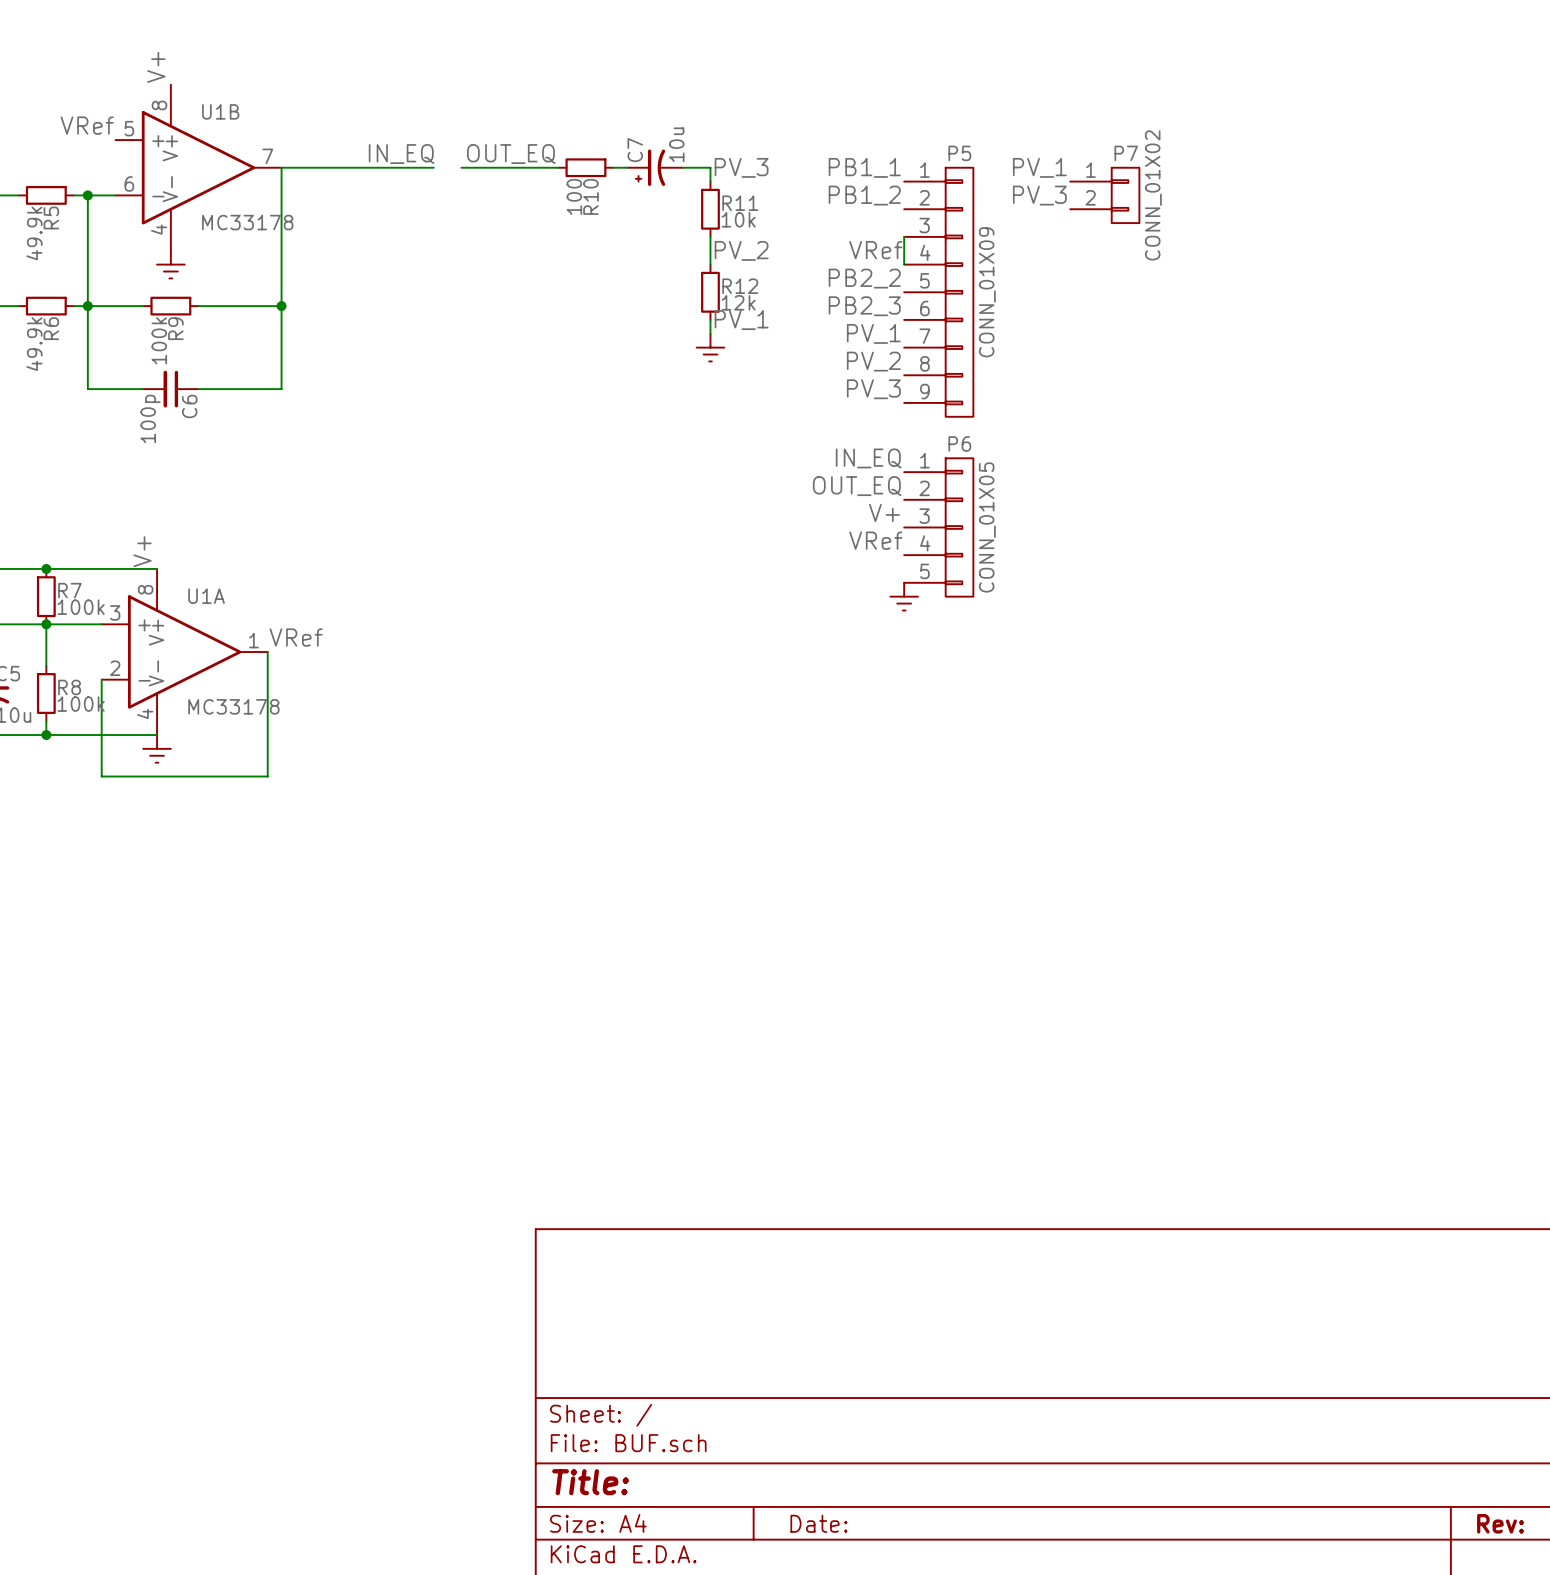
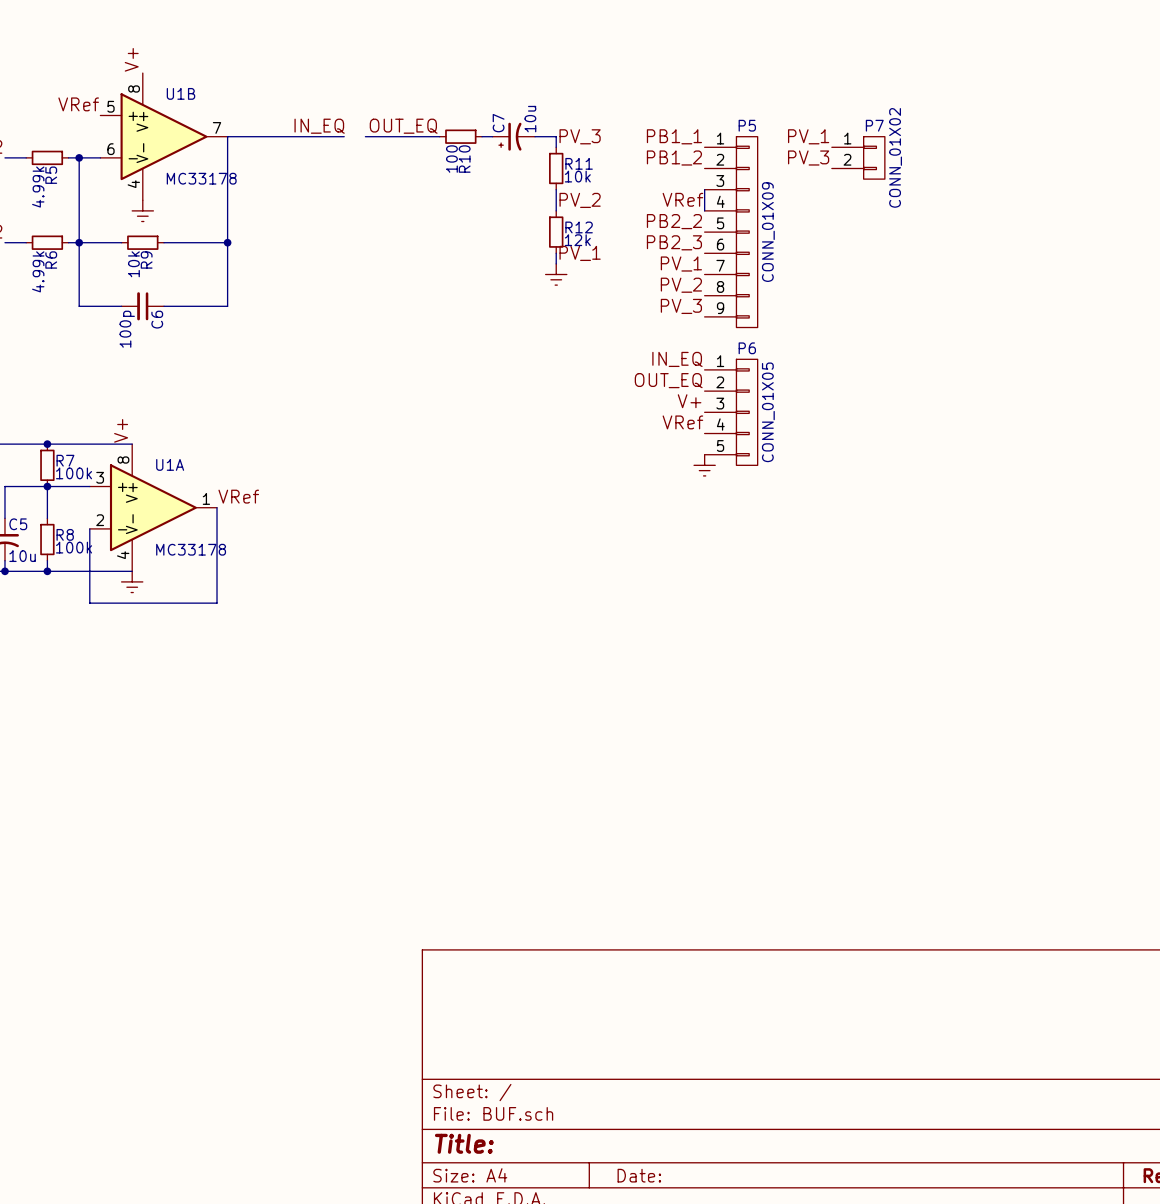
R5 value: 49.9k (34, 233) -> 4.99k (38, 187)
R9 value: 100k (159, 340) -> 10k (133, 264)
R6 value: 49.9k (34, 344) -> 4.99k (38, 271)

